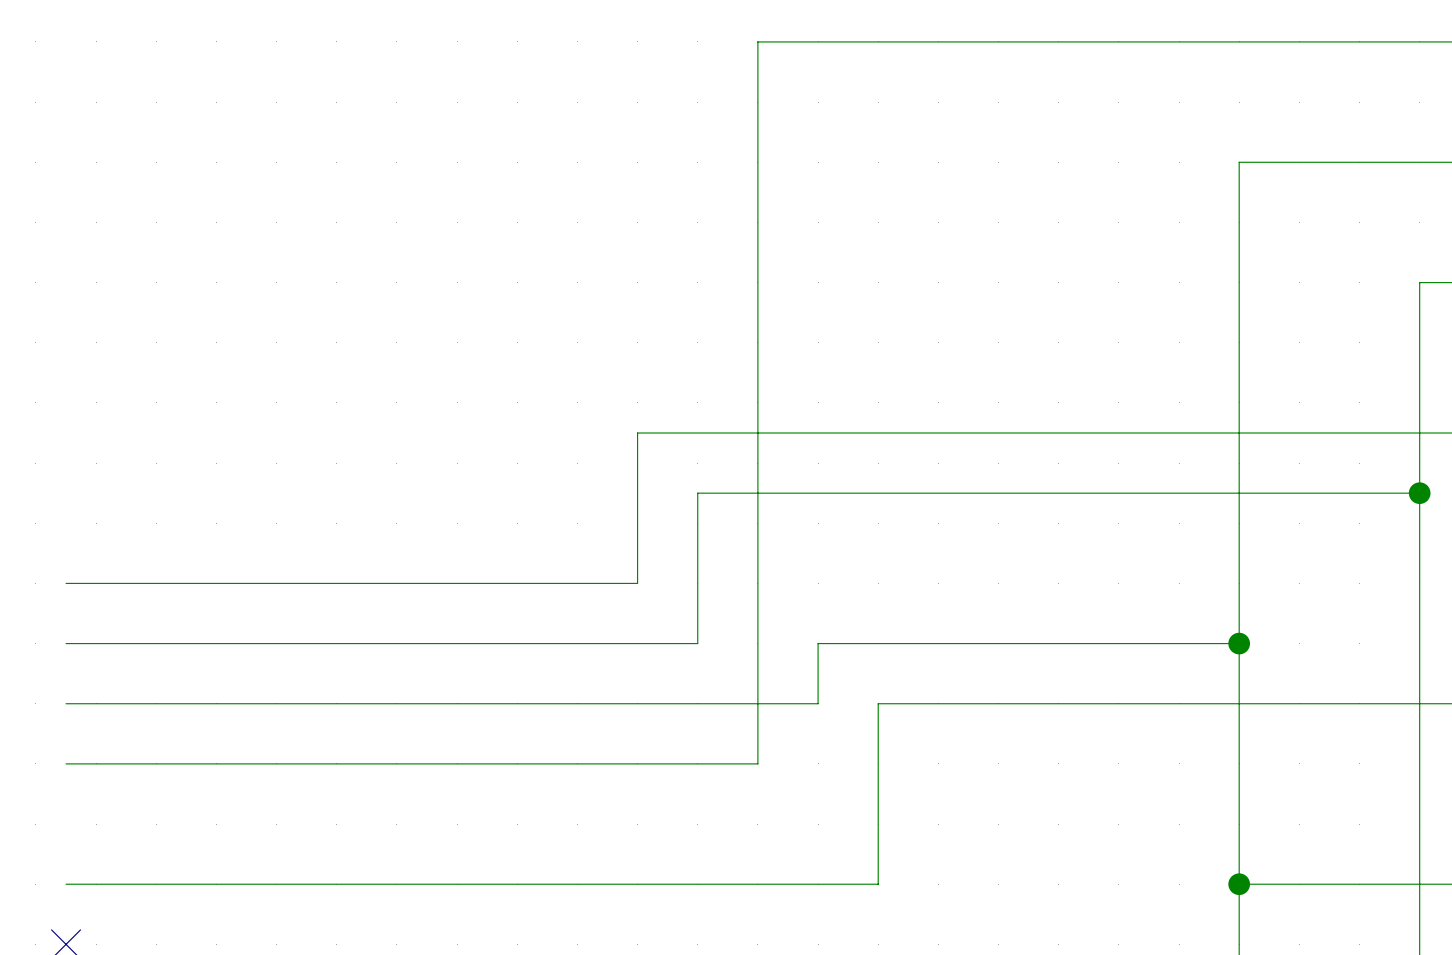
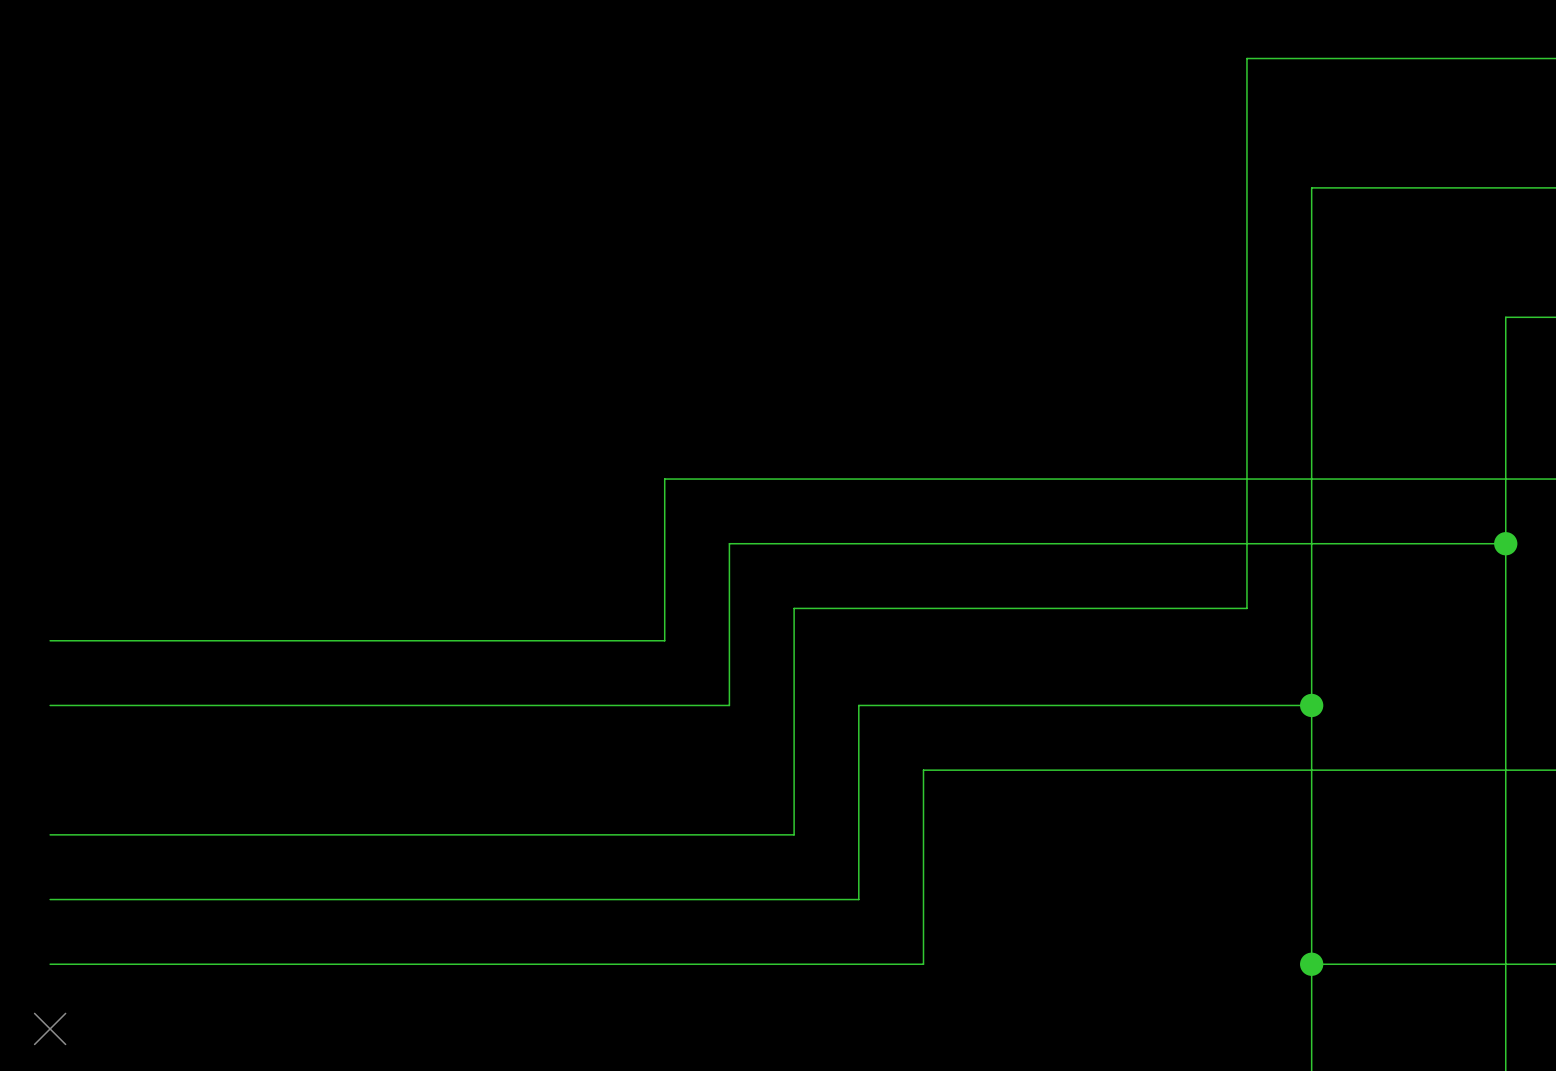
wire: (1179, 41) (757, 41) (757, 553) -> (1246, 58) (1246, 608) (794, 608)
wire: (66, 703) (818, 703) -> (50, 899) (858, 899) (858, 770)

